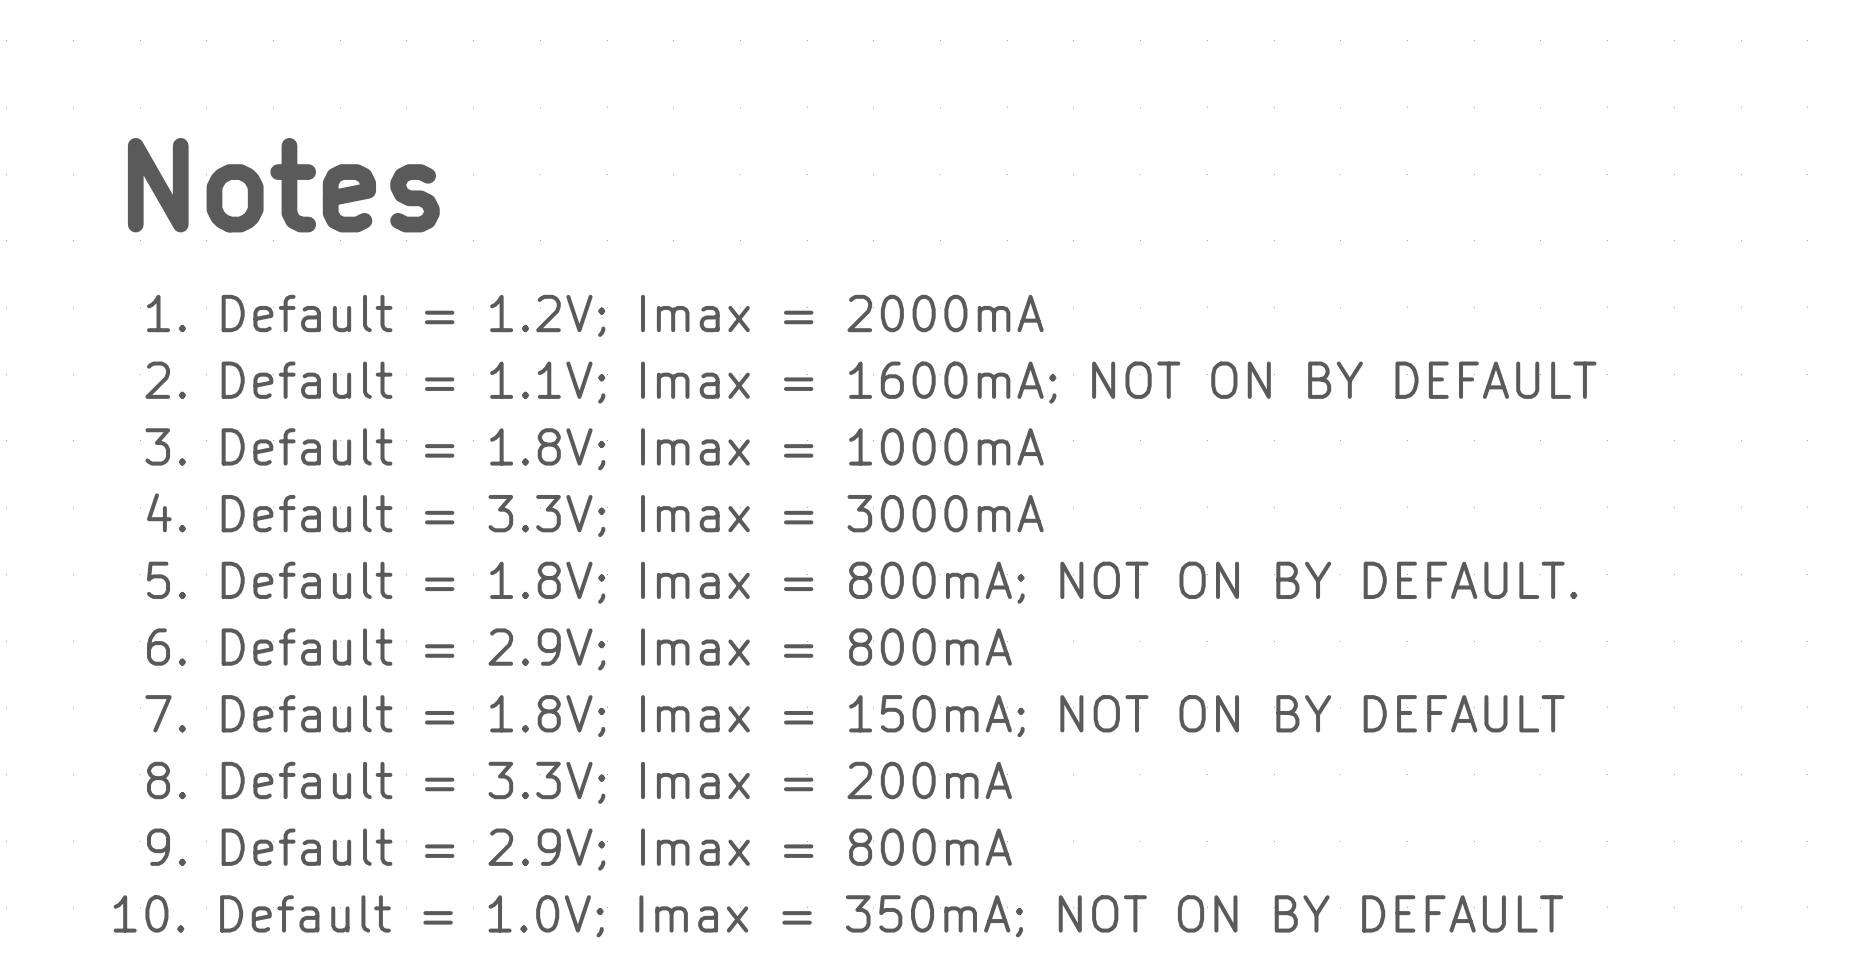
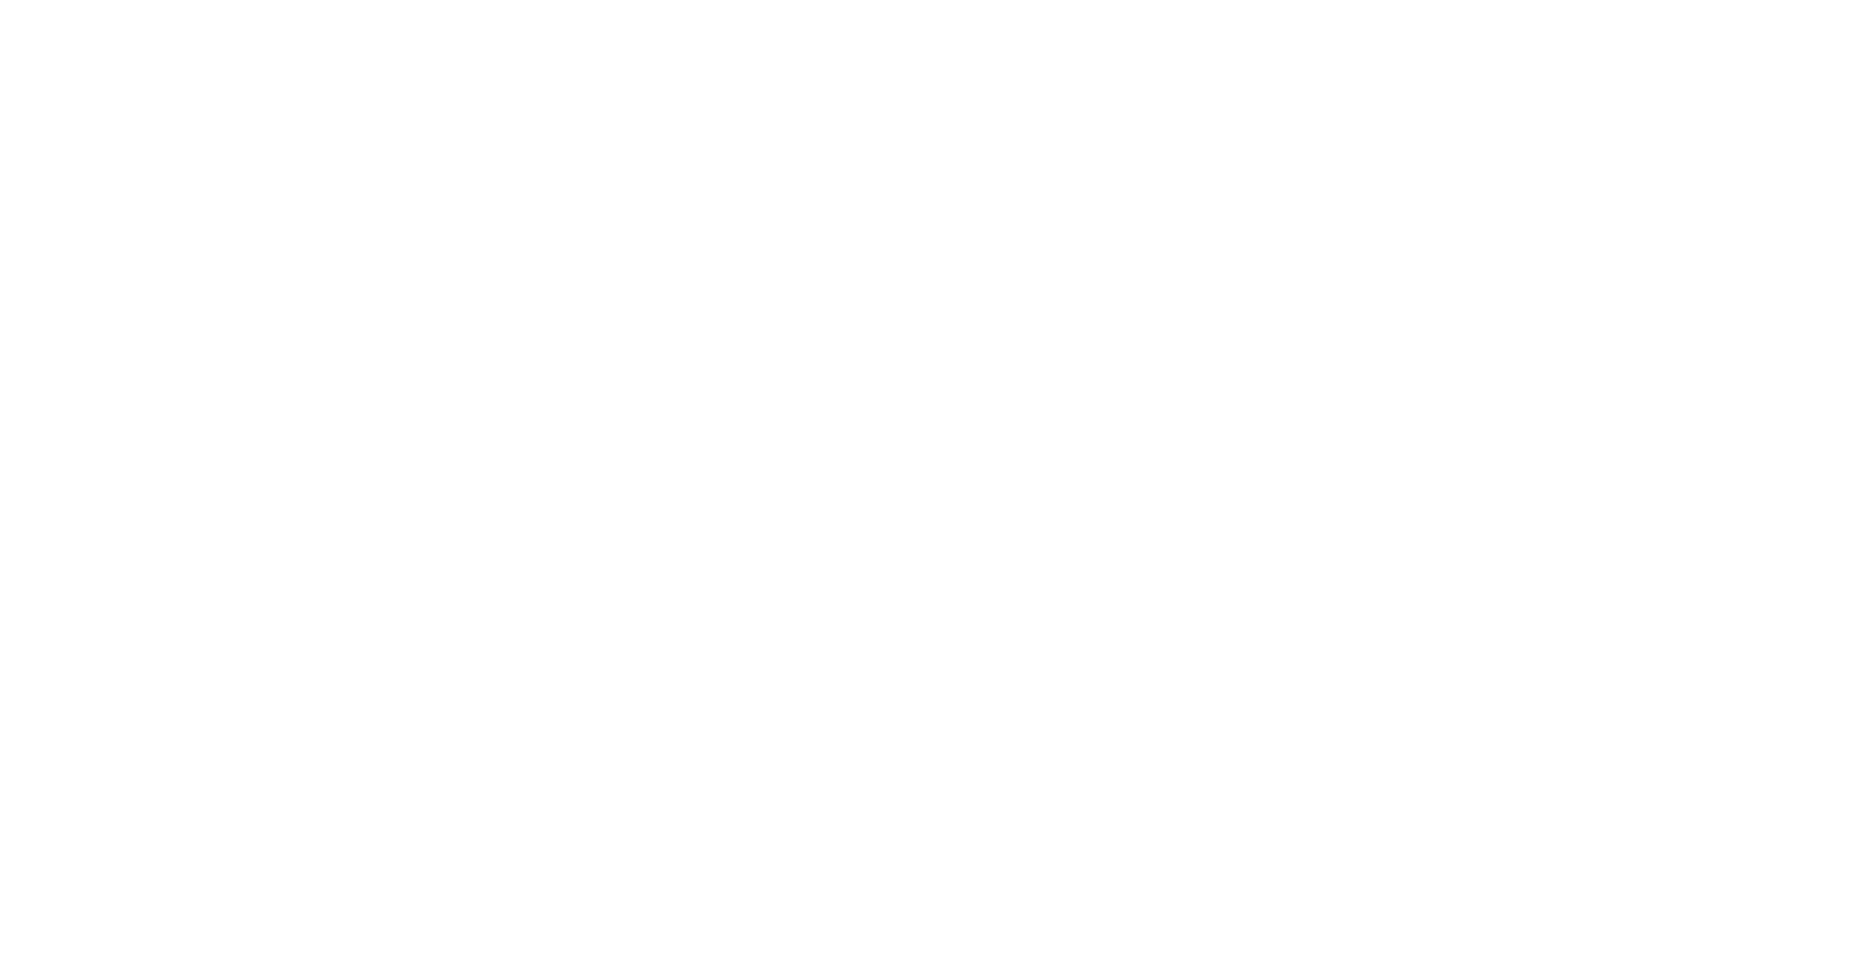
text: Notes (283, 185) -> none
text: 1. Default = 1.2V; Imax = 2000mA (595, 315) -> none
text: 2. Default = 1.1V; Imax = 1600mA; NOT ON BY DEFAULT (870, 382) -> none
text: 3. Default = 1.8V; Imax = 1000mA (594, 449) -> none
text: 4. Default = 3.3V; Imax = 3000mA (595, 515) -> none
text: 5. Default = 1.8V; Imax = 800mA; NOT ON BY DEFAULT. (862, 582) -> none
text: 6. Default = 2.9V; Imax = 800mA (579, 649) -> none
text: 7. Default = 1.8V; Imax = 150mA; NOT ON BY DEFAULT (855, 716) -> none
text: 8. Default = 3.3V; Imax = 200mA (579, 782) -> none
text: 9. Default = 2.9V; Imax = 800mA (579, 849) -> none
text: 10. Default = 1.0V; Imax = 350mA; NOT ON BY DEFAULT (838, 916) -> none

